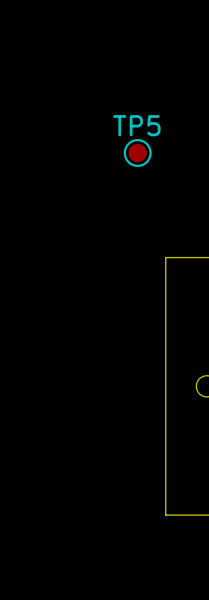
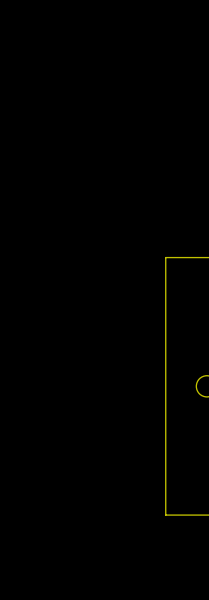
TP5: (137, 153) -> none

